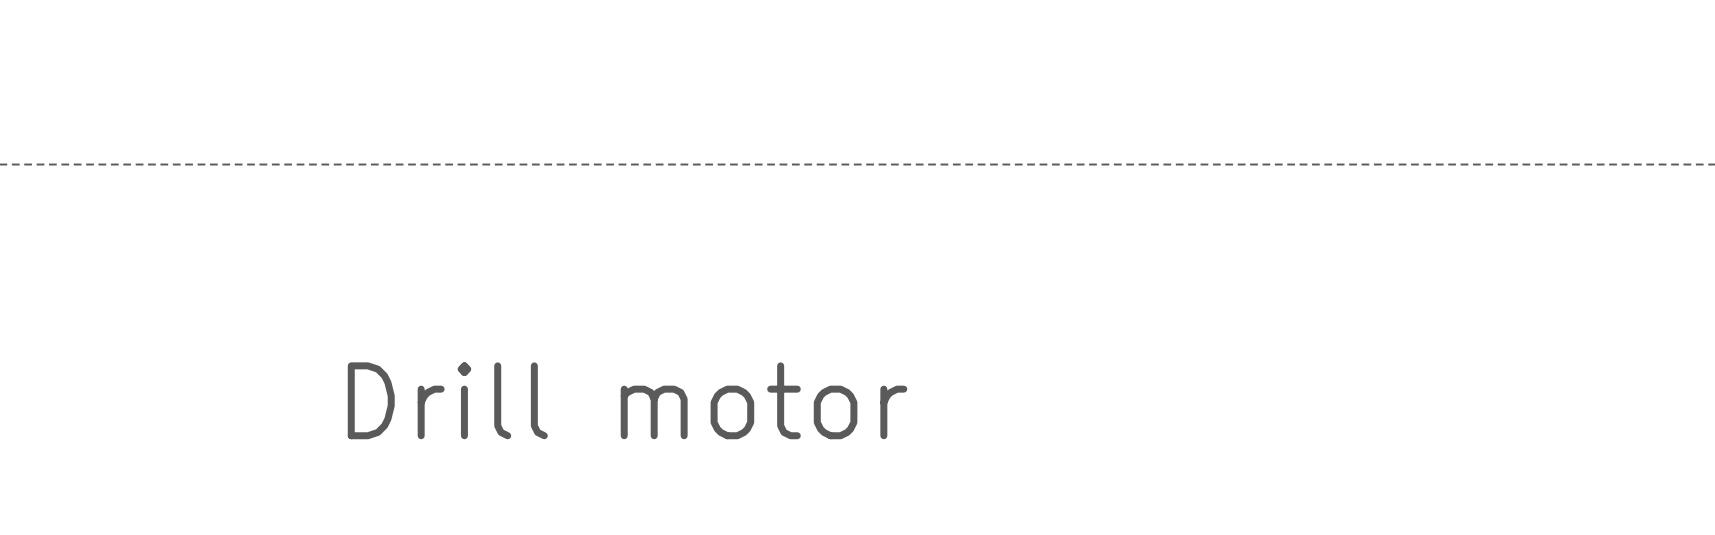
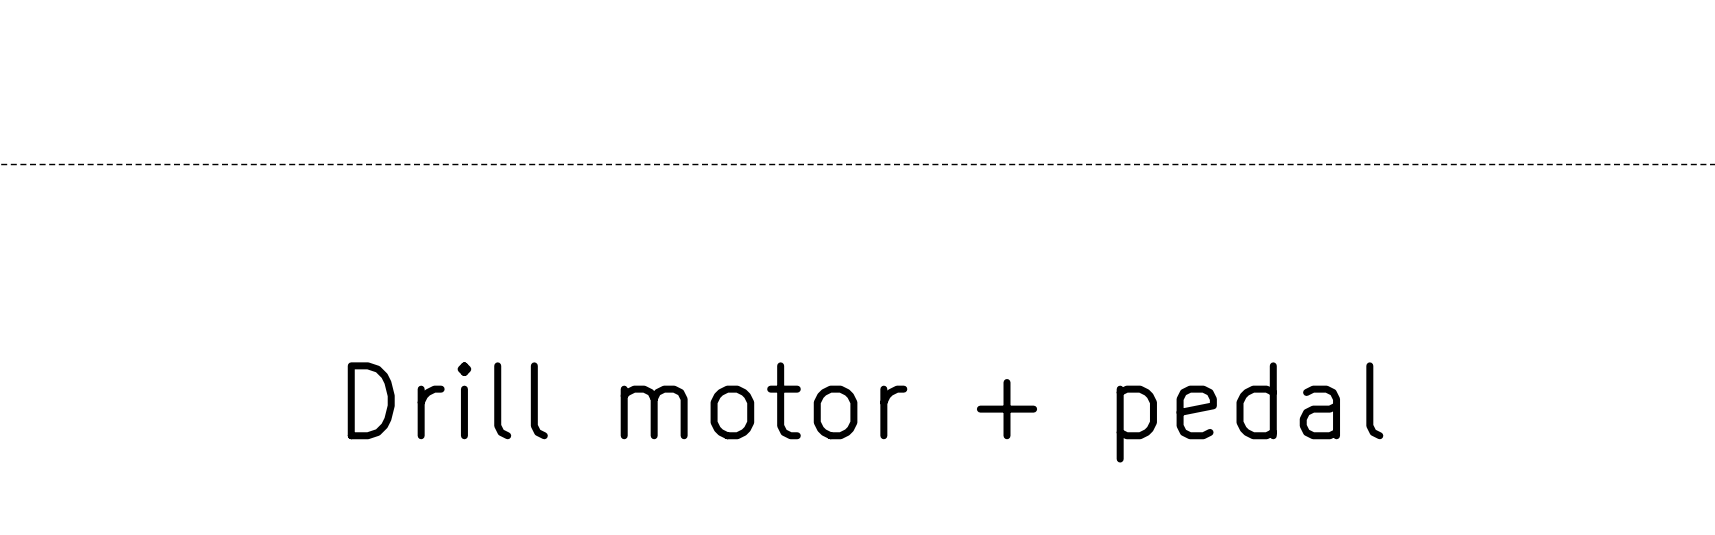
text: Drill motor (627, 400) -> Drill motor + pedal (865, 412)

